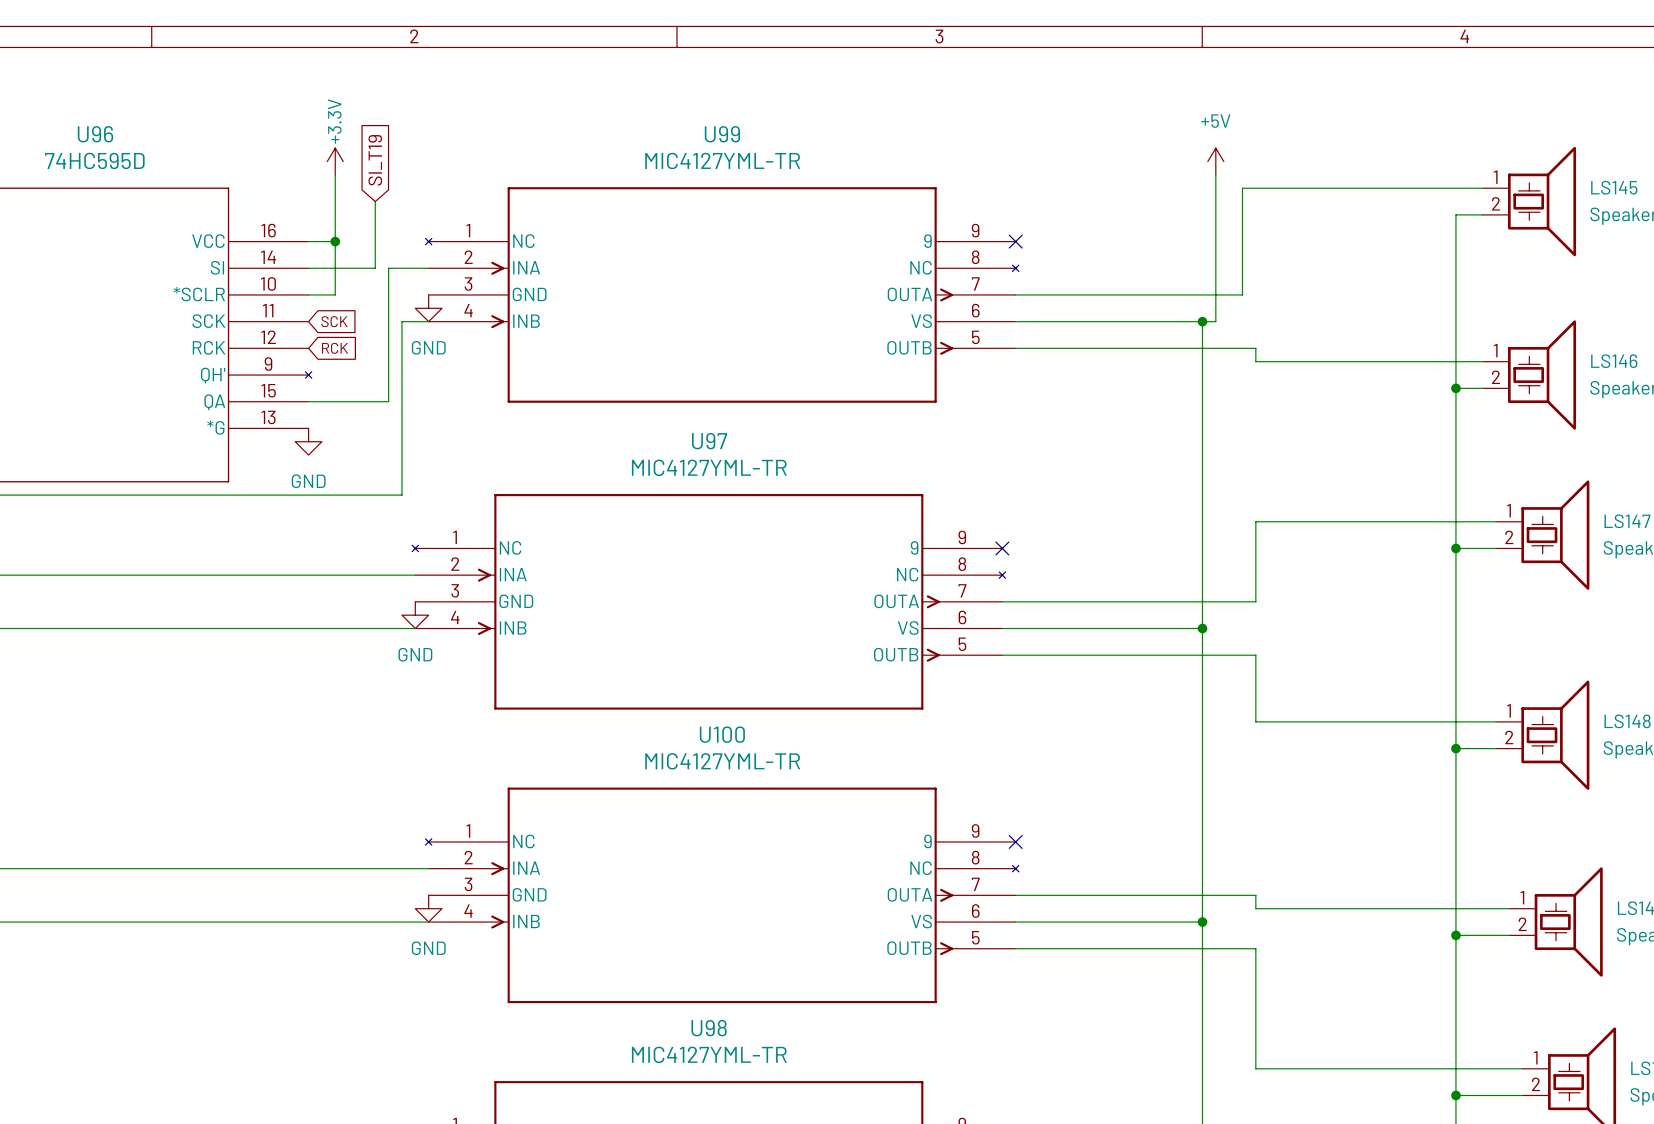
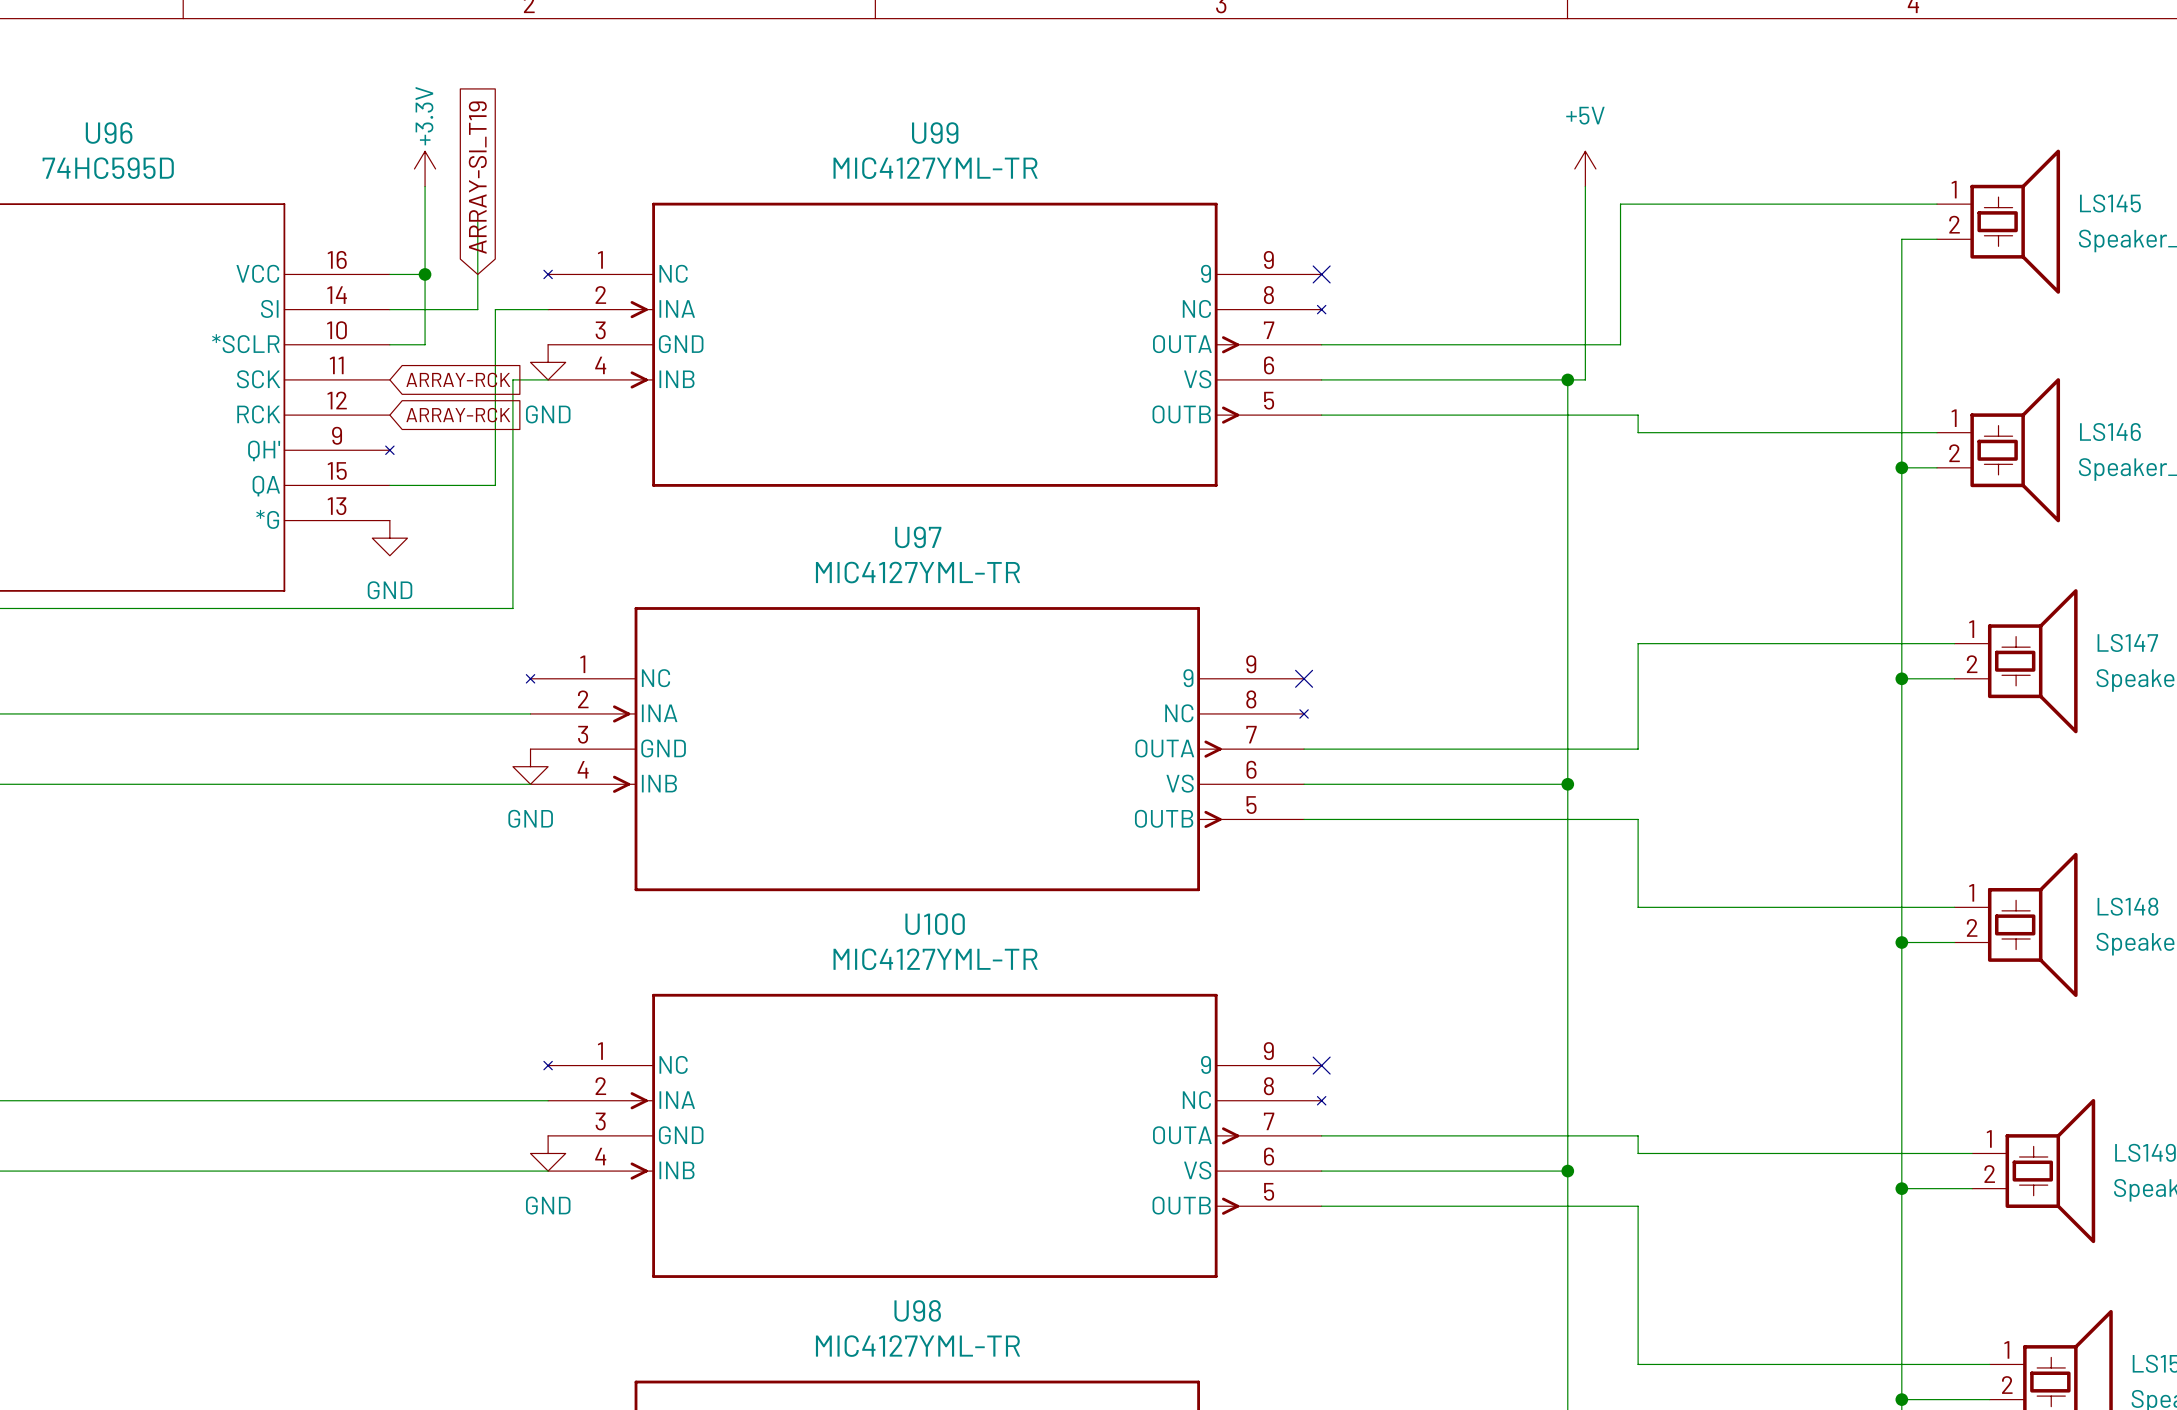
global label: SI_T19 (375, 160) -> ARRAY-SI_T19 (477, 177)
global label: SCK (334, 321) -> ARRAY-RCK (458, 379)
global label: RCK (335, 348) -> ARRAY-RCK (458, 415)

